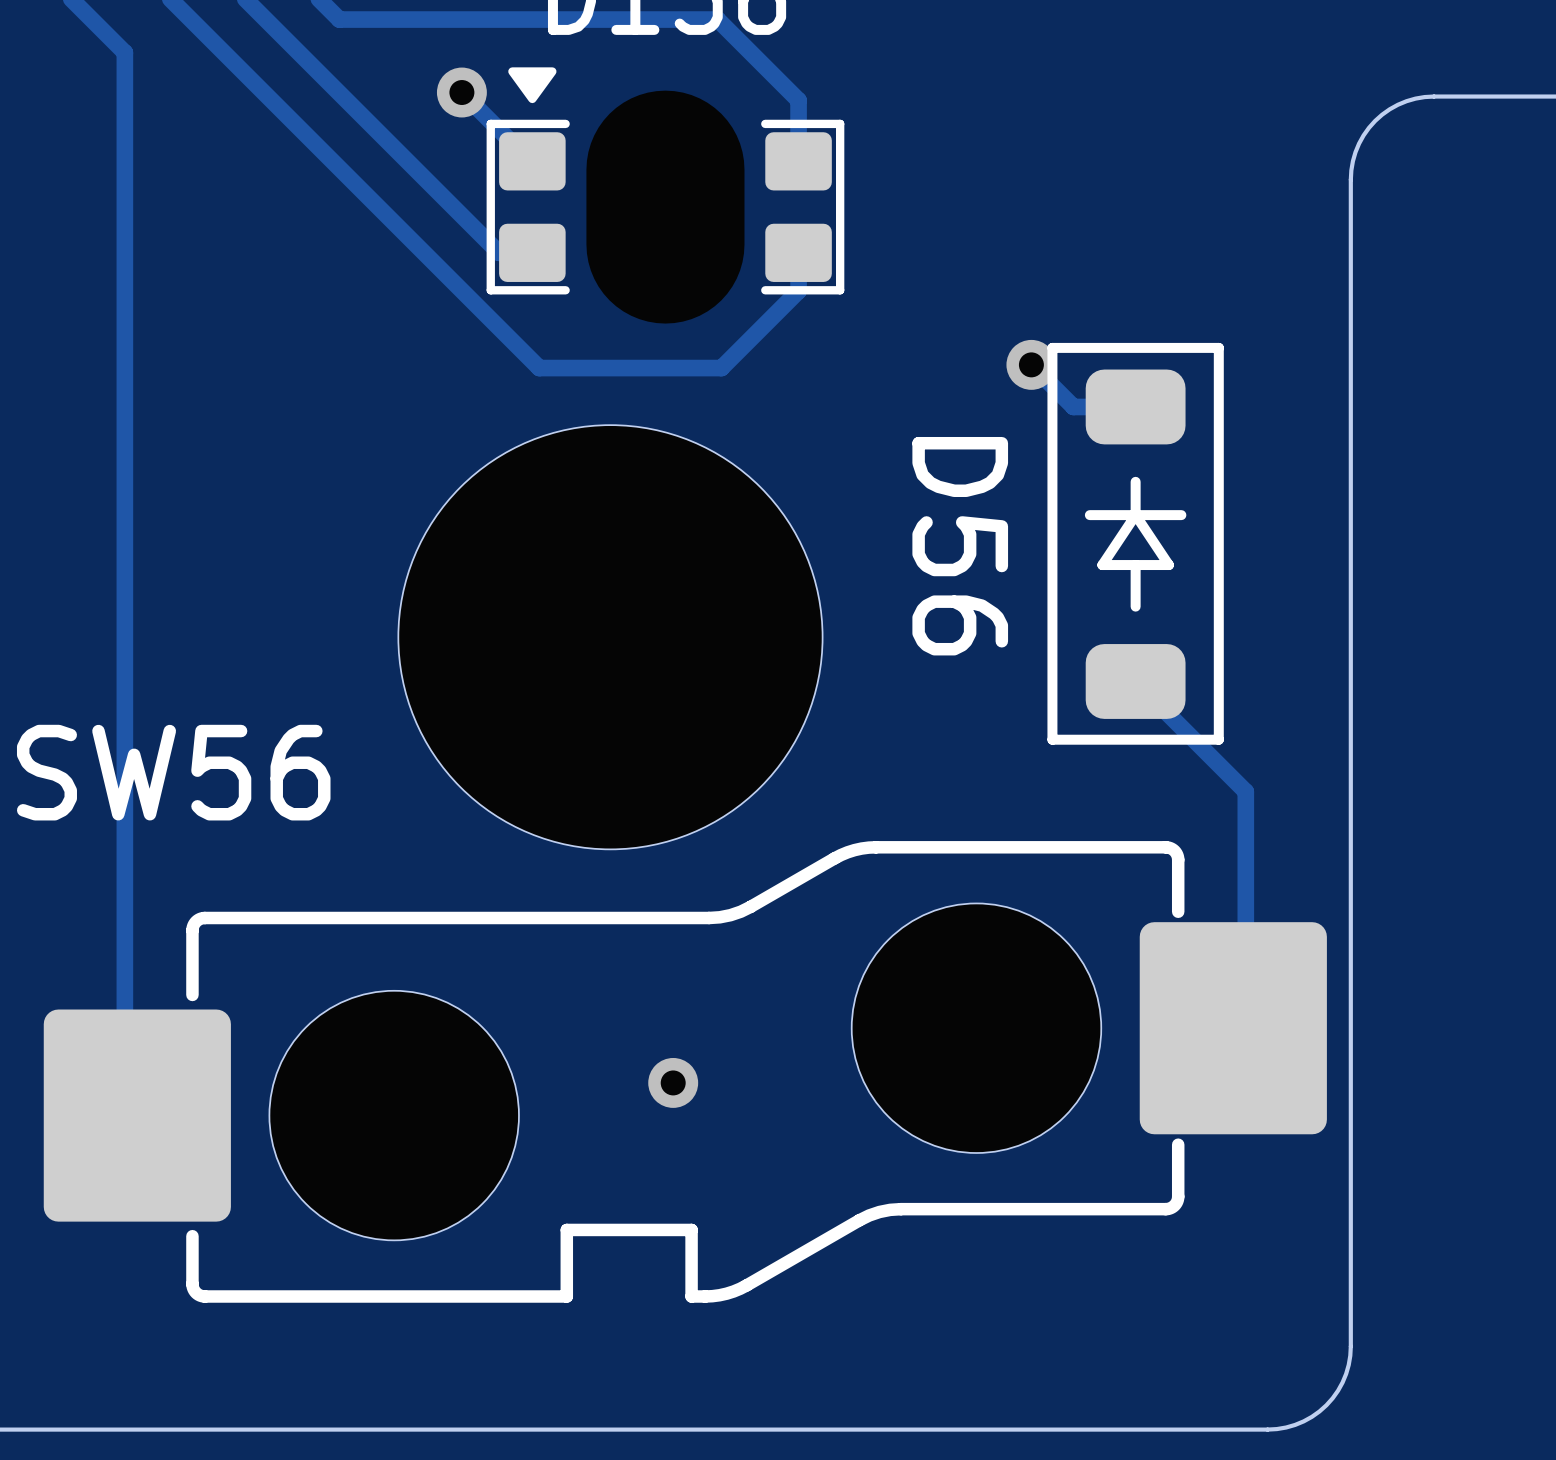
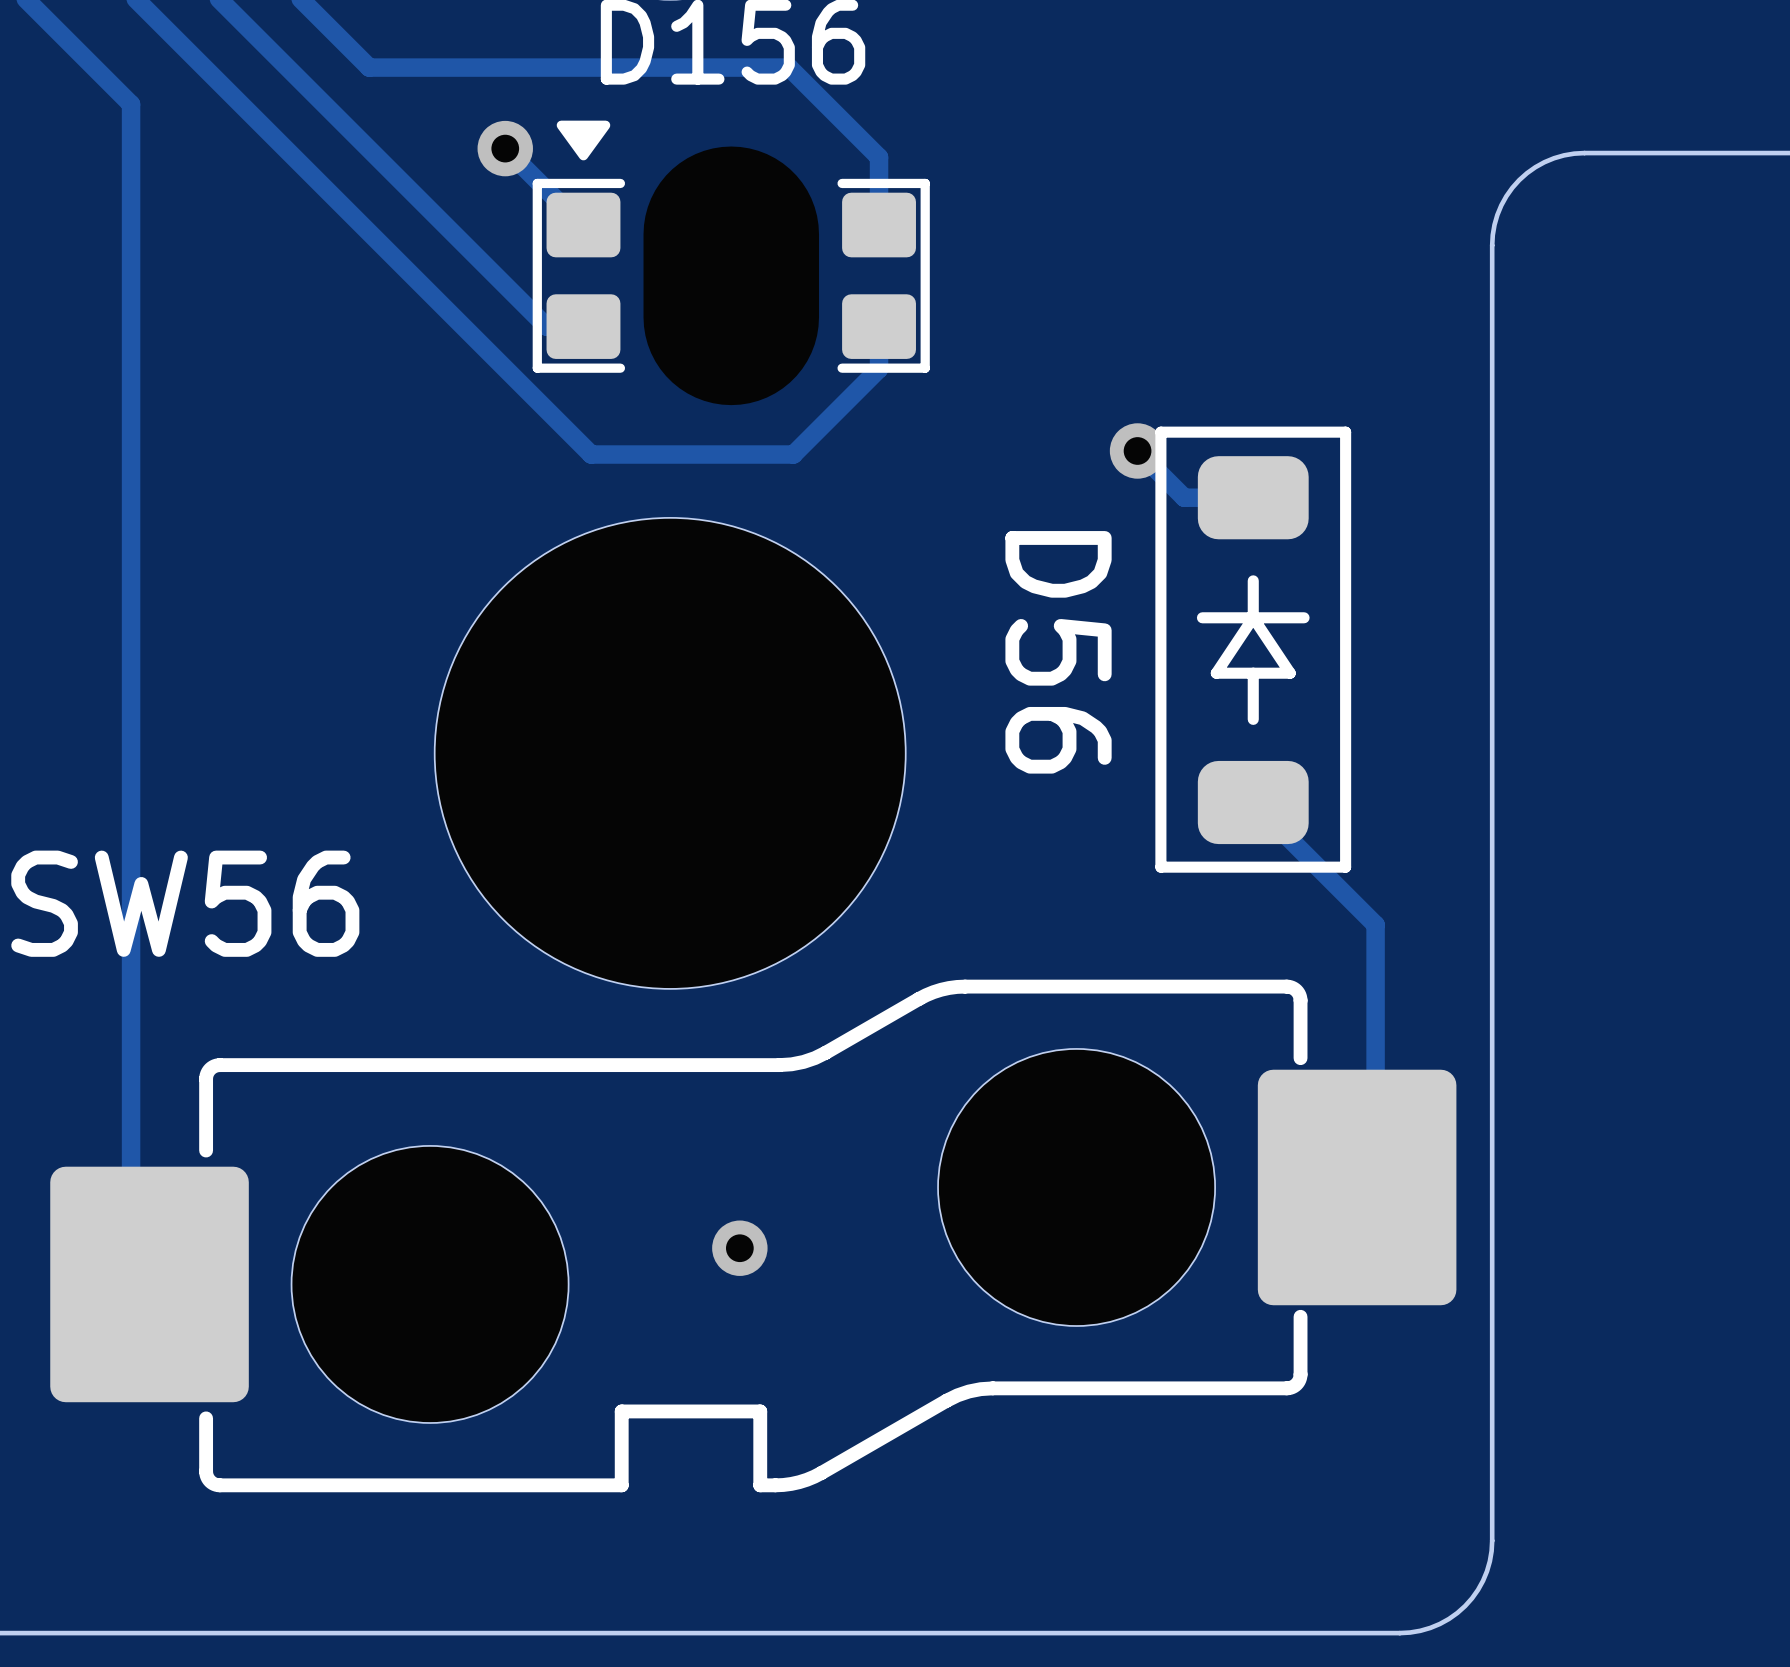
SW56 footprint: [43, 425, 1327, 1303] -> [50, 517, 1457, 1493]

